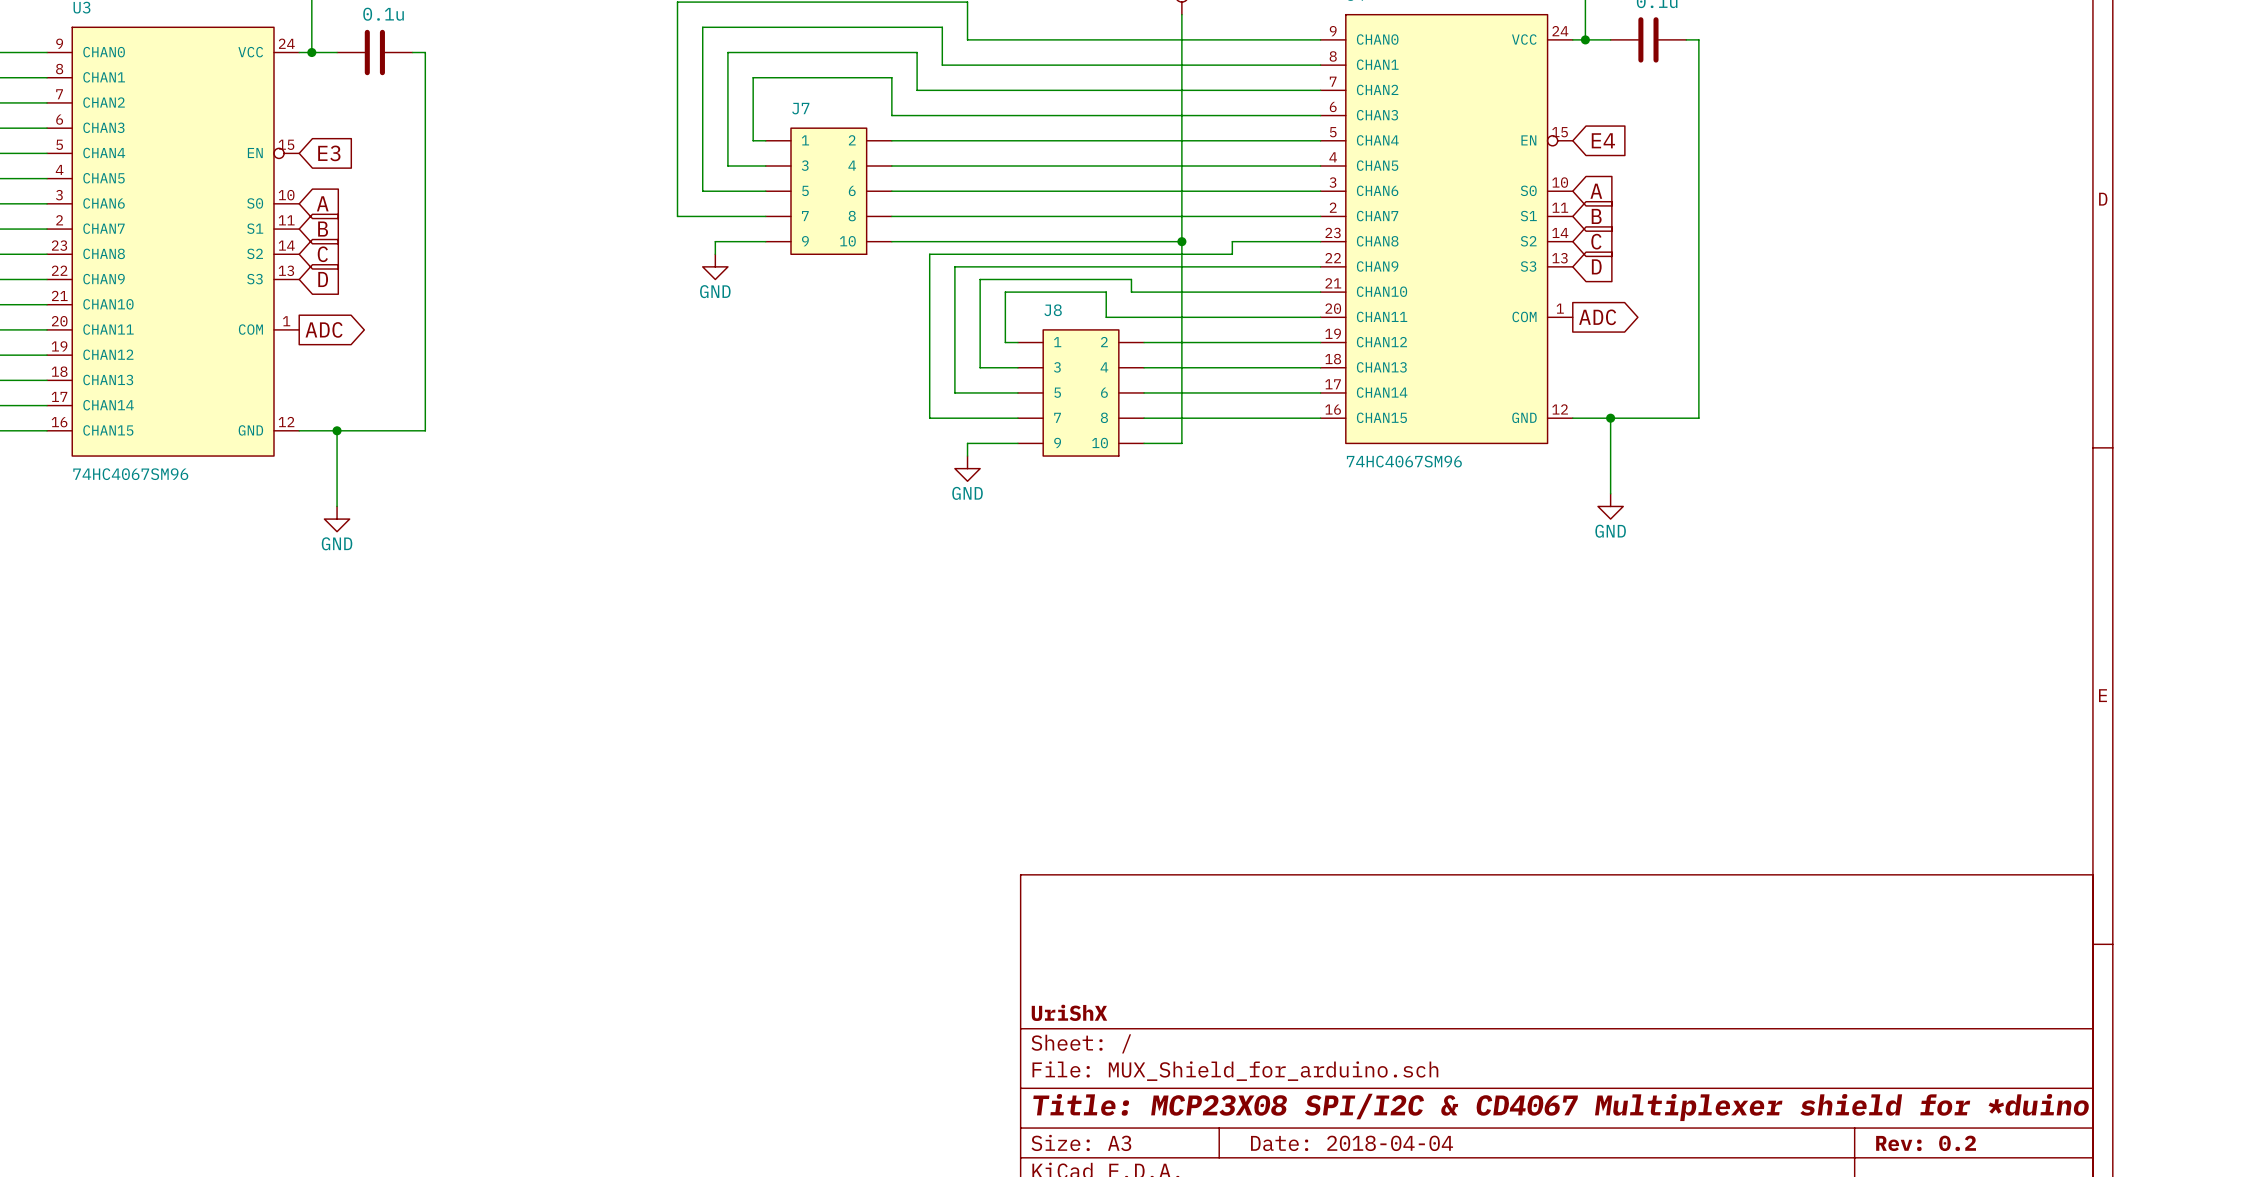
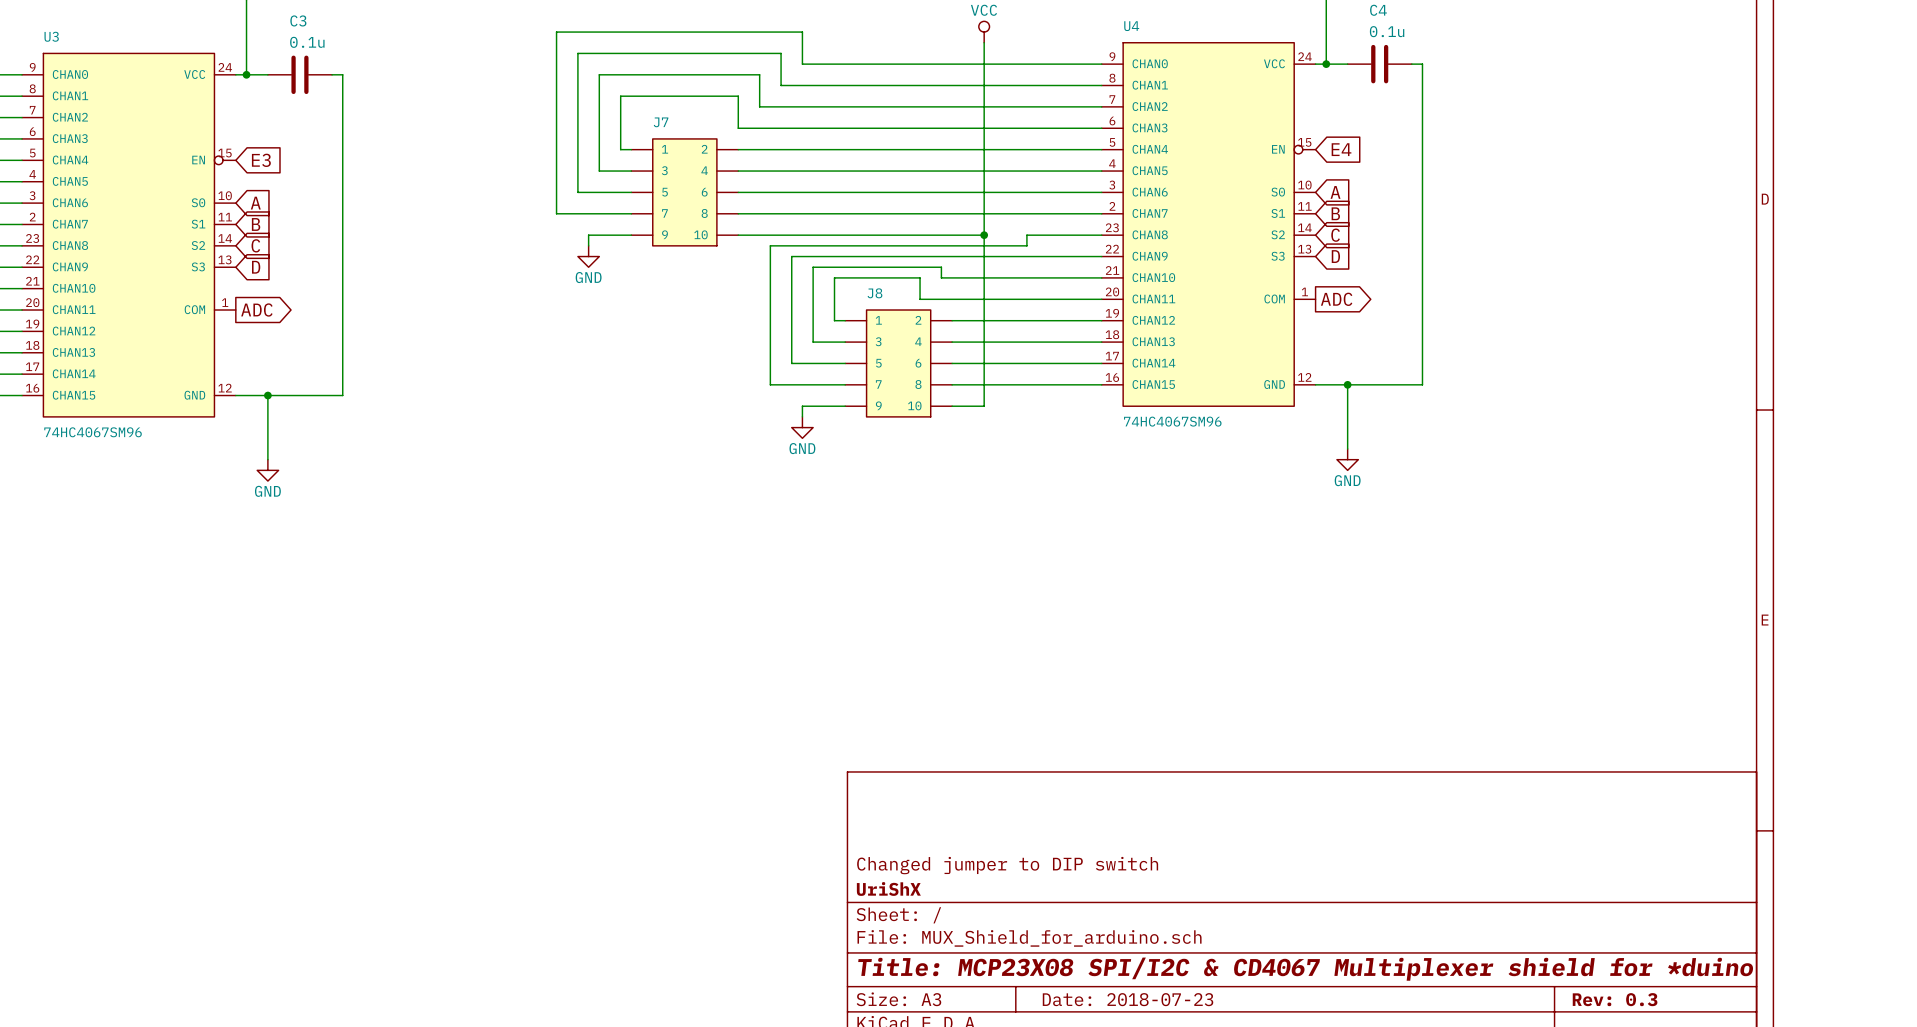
title block: none -> Changed jumper to DIP switch (1007, 865)
title block: Date: 2018-04-04 (1352, 1143) -> Date: 2018-07-23 (1128, 999)
title block: Rev: 0.2 (1926, 1143) -> Rev: 0.3 (1615, 999)

